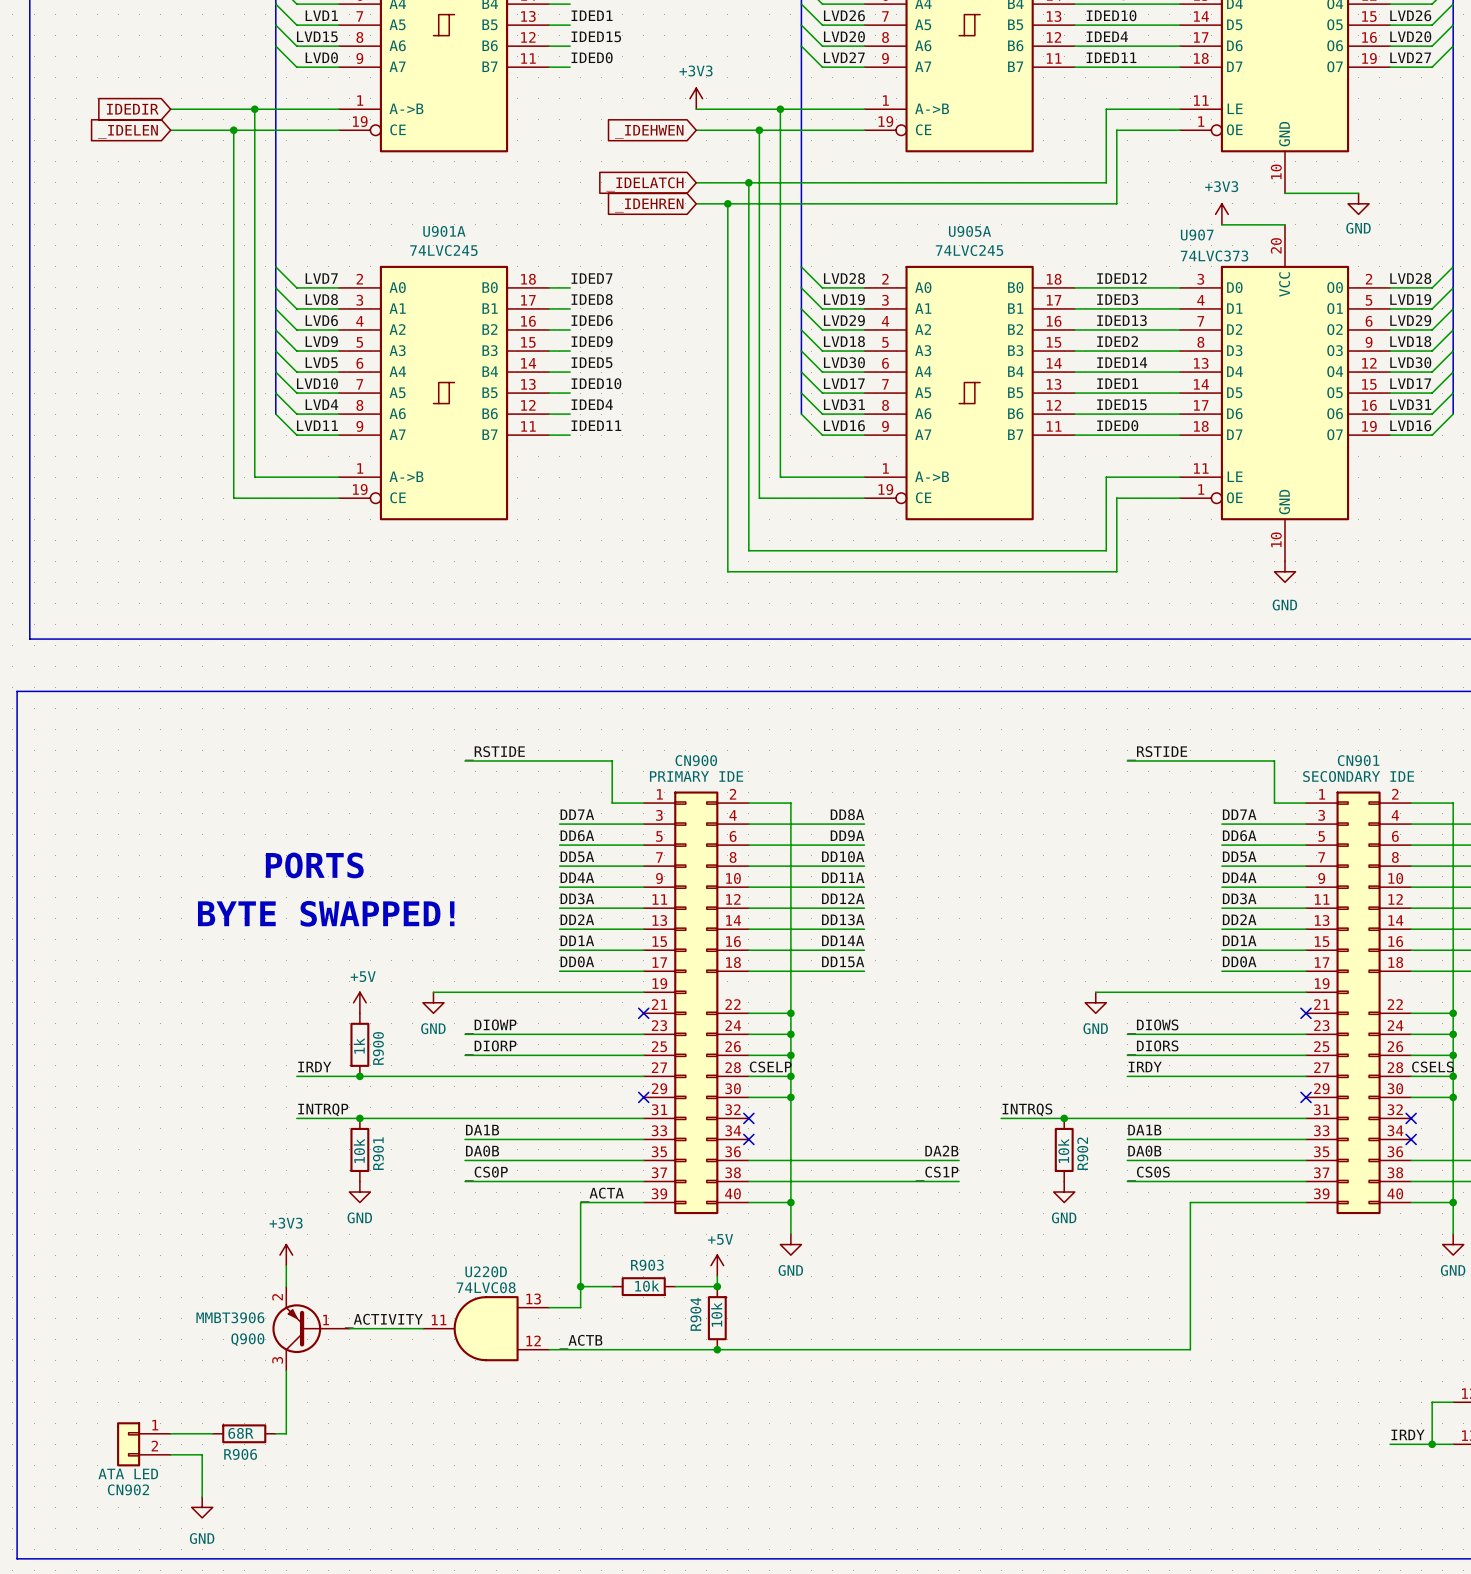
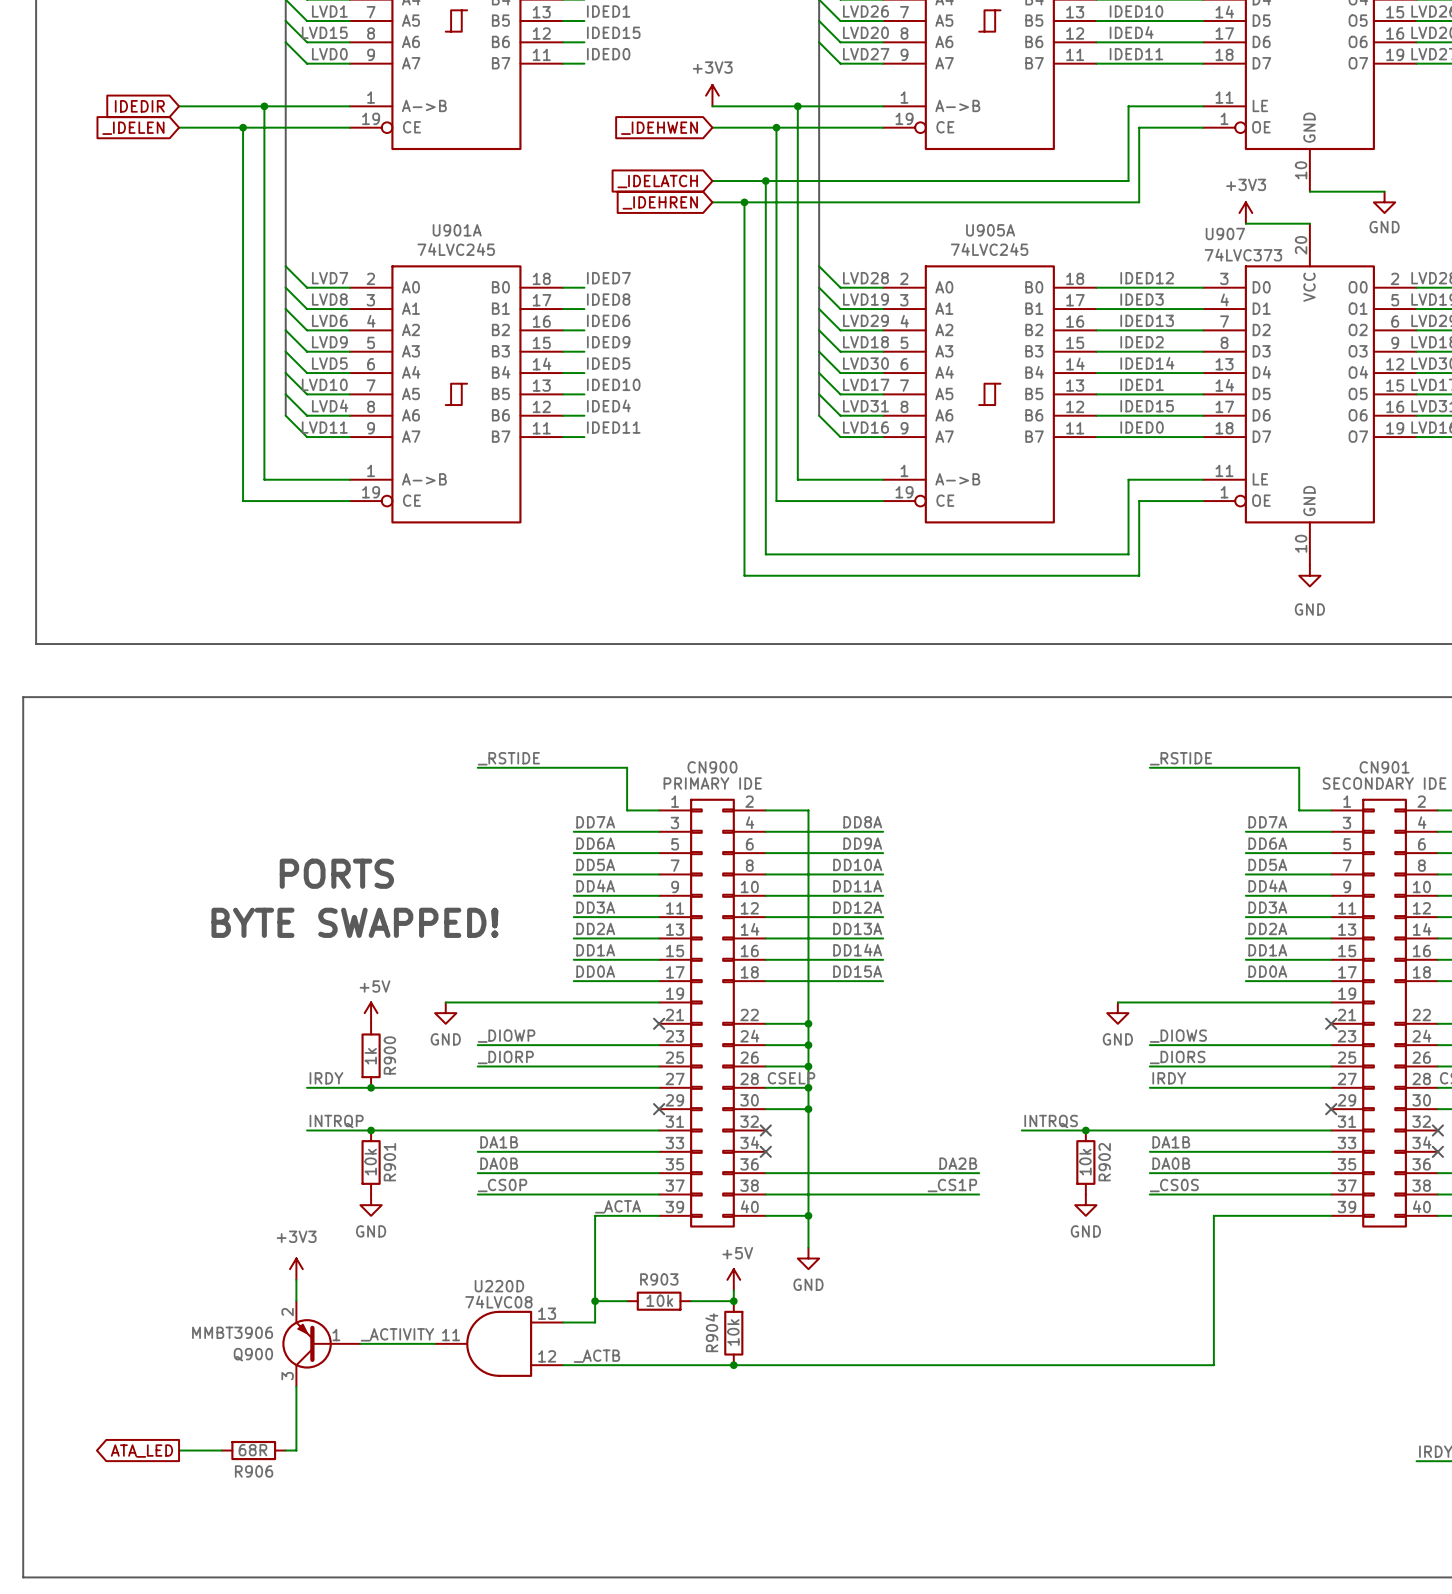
global label: none -> ATA_LED (141, 1451)
CN902: ATA LED (143, 1444) -> none
wire: (170, 1454) (202, 1454) (202, 1496) -> none
power symbol: GND (202, 1507) -> none

